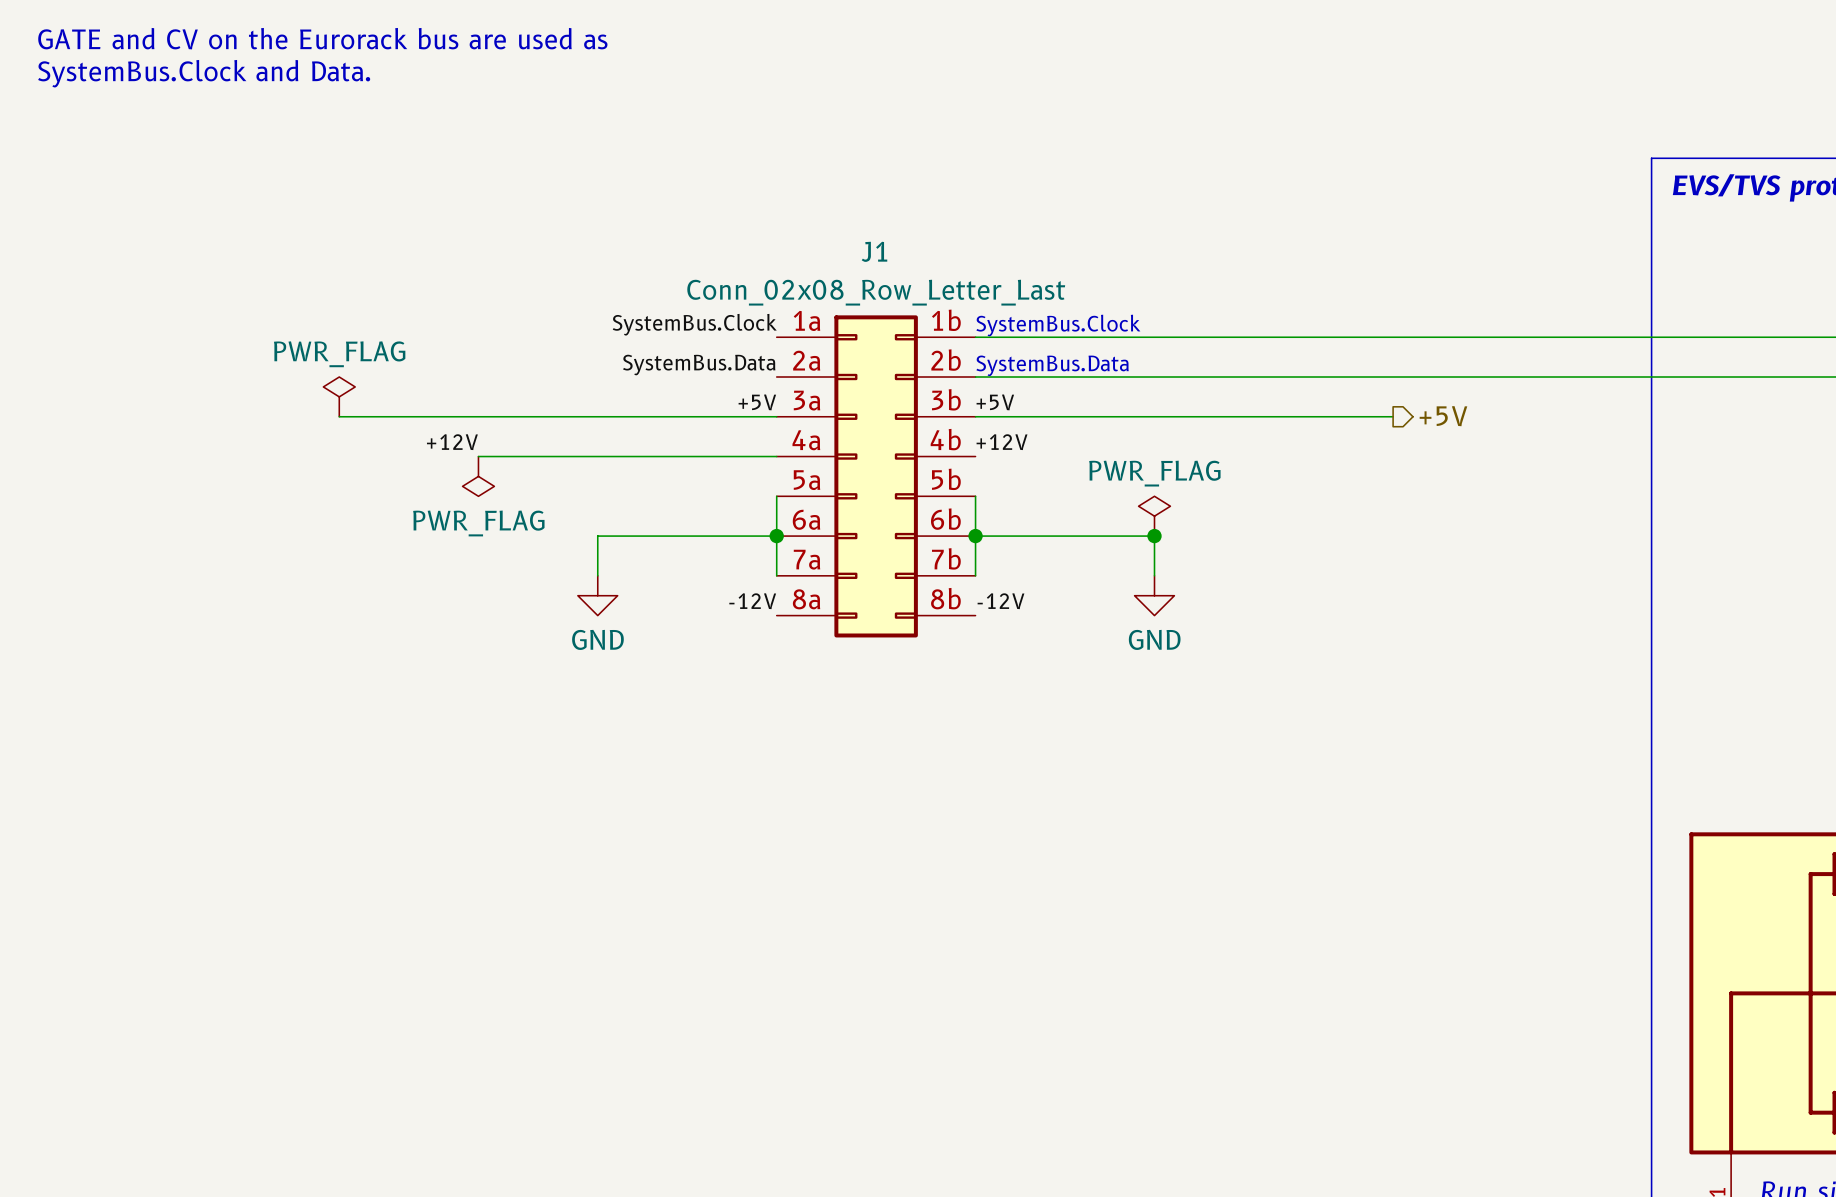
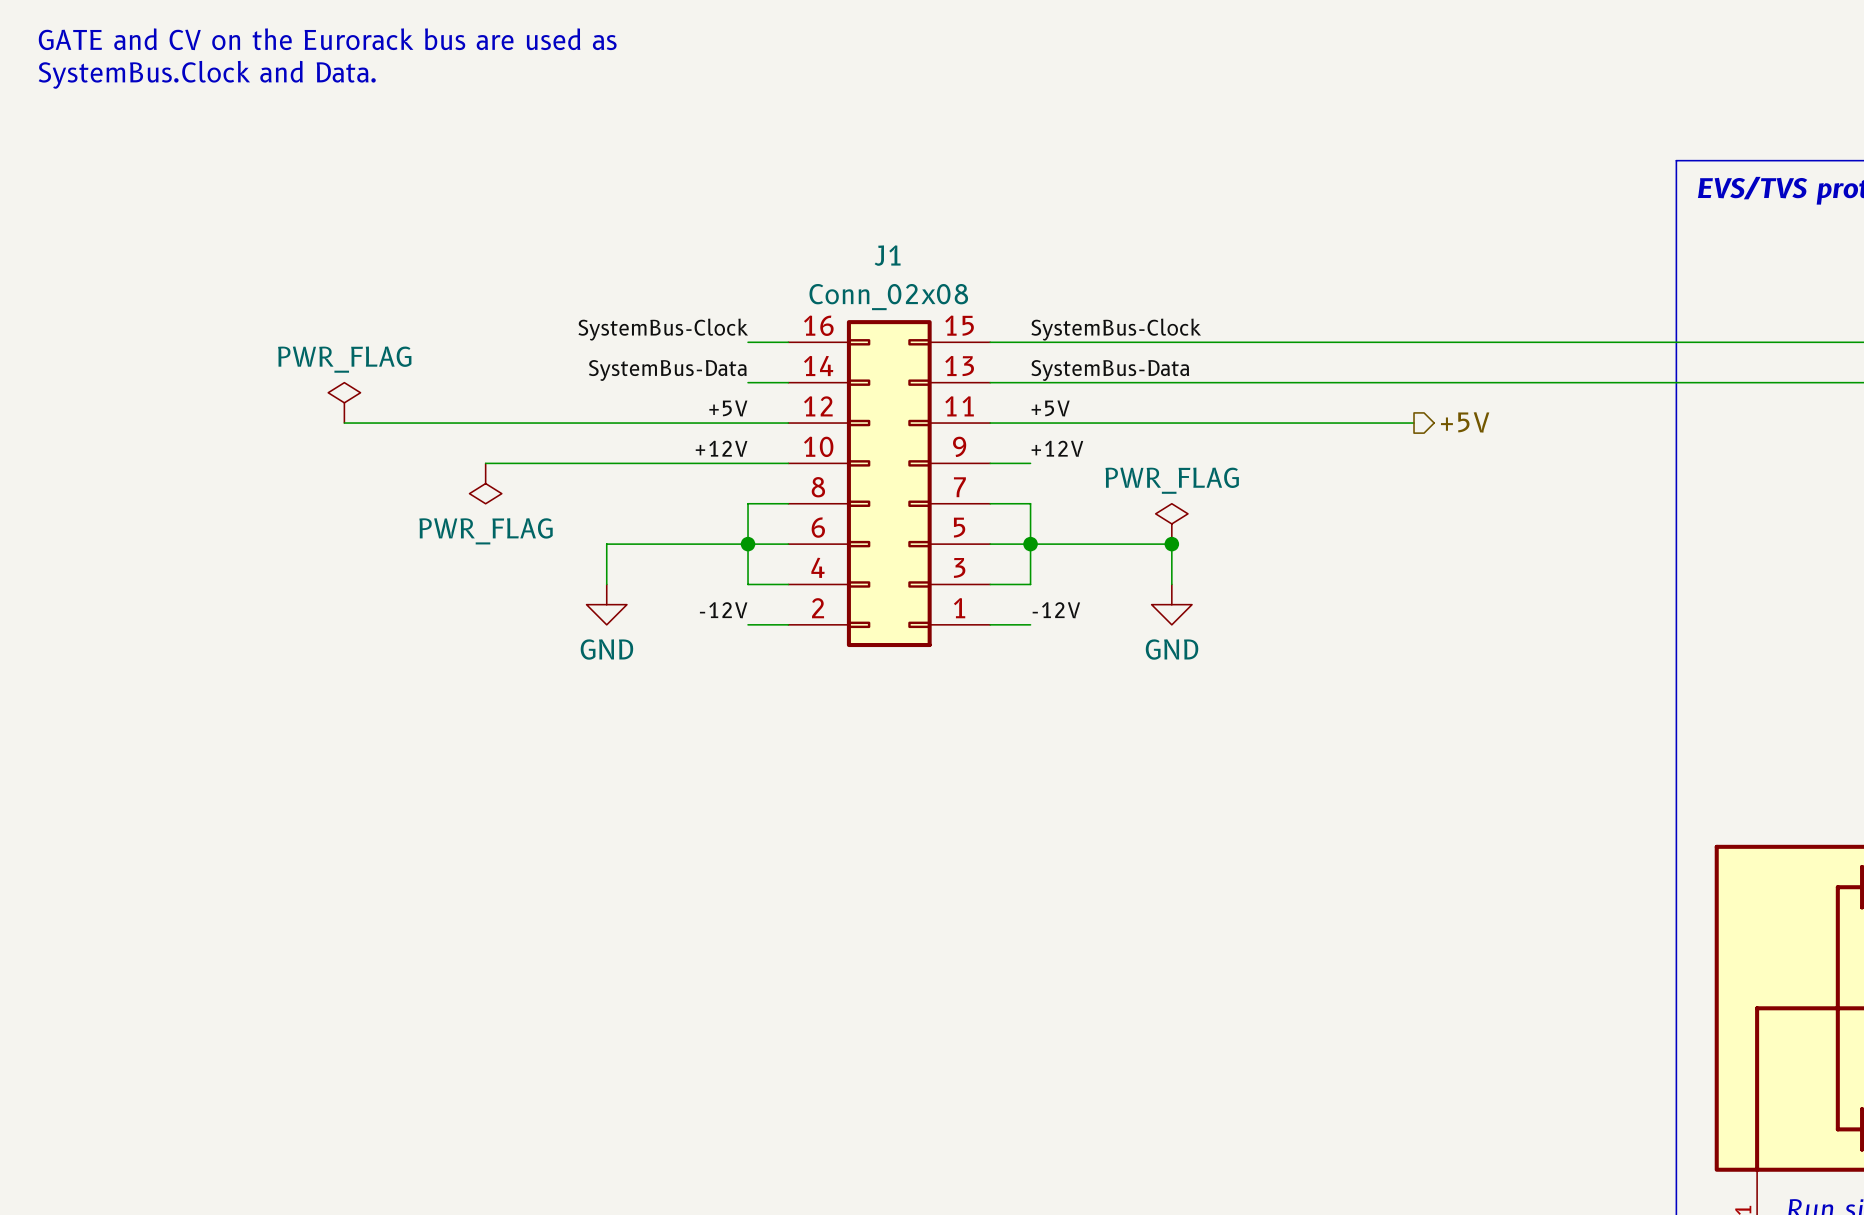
J1 value: Conn_02x08_Row_Letter_Last (876, 292) -> Conn_02x08 (888, 297)
J1 symbol: [776, 315, 976, 638] -> [788, 320, 991, 648]
label: SystemBus.Clock (694, 324) -> SystemBus-Clock (663, 329)
label: none -> SystemBus-Clock (1116, 329)
text: SystemBus.Clock (1058, 325) -> none
wire: none -> (748, 342) (788, 342)
label: SystemBus.Data (699, 365) -> SystemBus-Data (667, 370)
text: SystemBus.Data (1052, 365) -> none
label: none -> SystemBus-Data (1110, 370)
wire: none -> (748, 382) (788, 382)
label position: +5V (757, 402) -> +5V (728, 408)
label position: +5V (995, 402) -> +5V (1050, 408)
label: +12V (452, 442) -> none
label: none -> +12V (721, 448)
label position: +12V (1002, 442) -> +12V (1057, 448)
wire: none -> (990, 463) (1030, 463)
wire: (776, 496) (776, 575) -> (788, 503) (748, 503) (748, 584) (788, 584)
wire: (975, 496) (975, 575) -> (990, 503) (1030, 503) (1030, 584) (990, 584)
junction position: (776, 536) -> (748, 544)
junction position: (975, 536) -> (1030, 544)
label position: -12V (752, 601) -> -12V (723, 610)
label position: -12V (1000, 601) -> -12V (1056, 610)
wire: none -> (748, 624) (788, 624)
wire: none -> (990, 624) (1030, 624)

